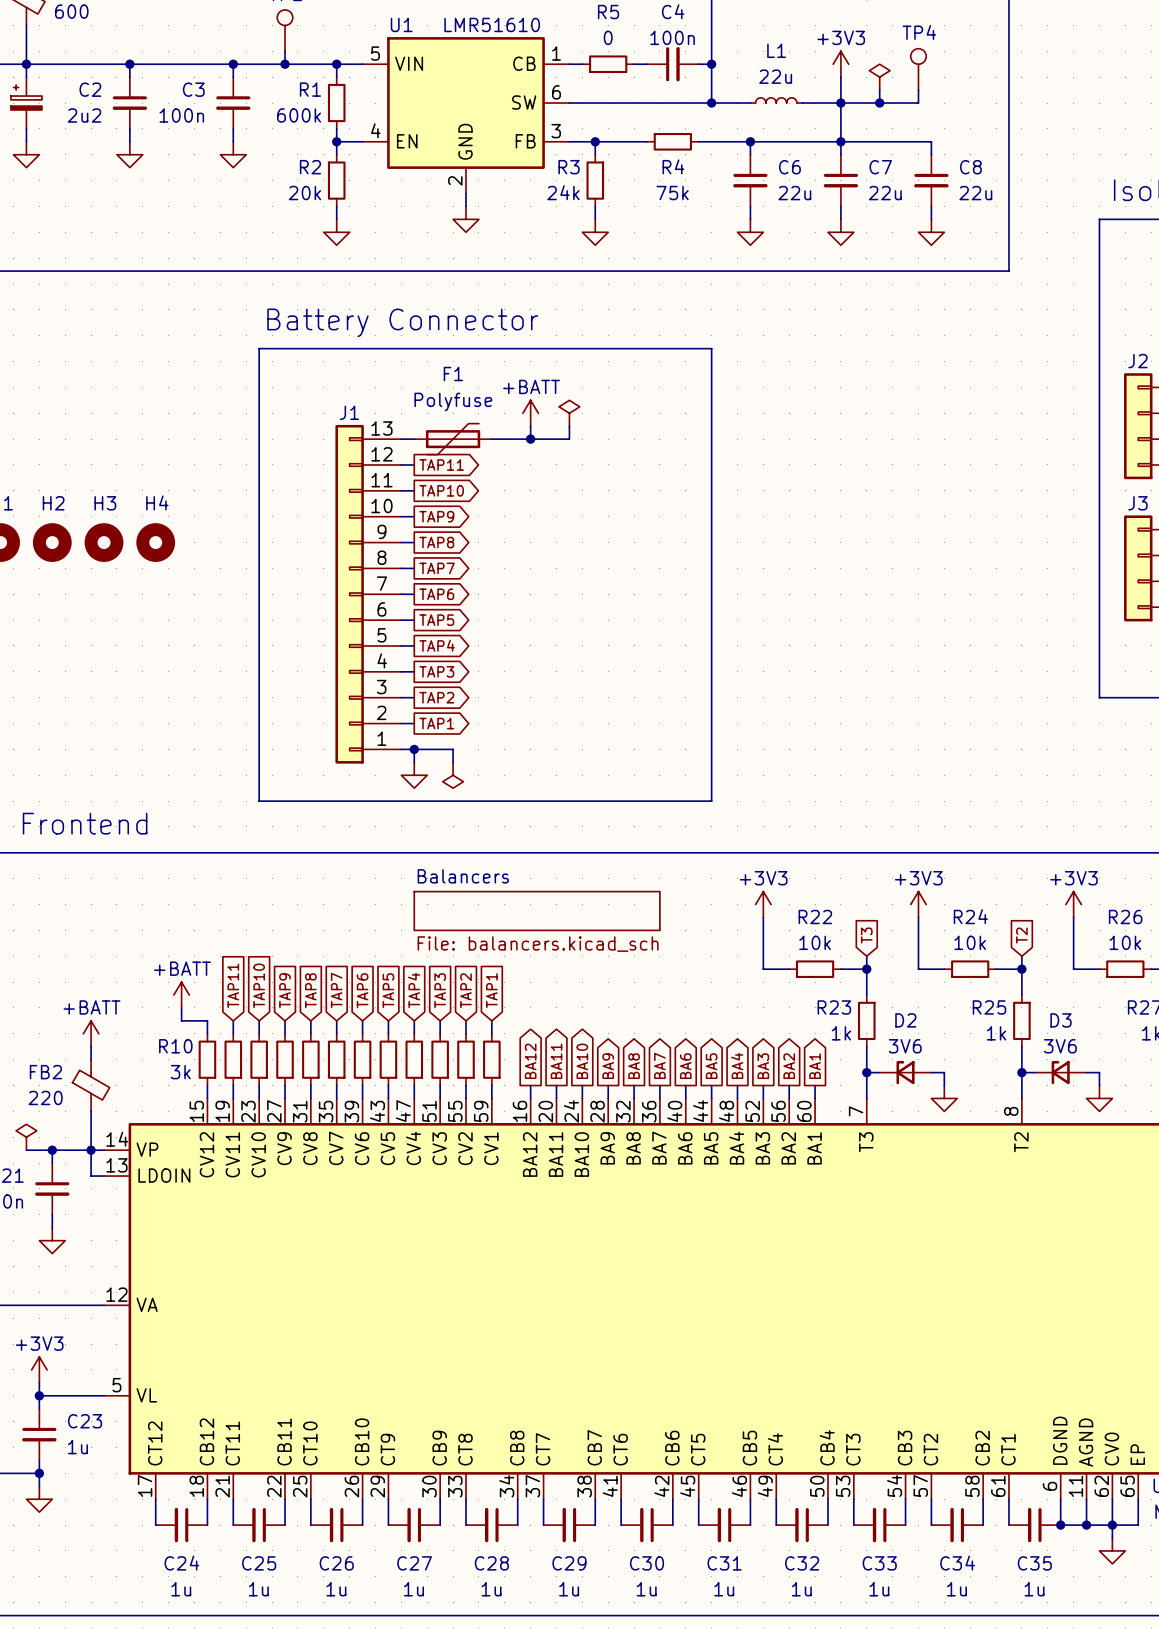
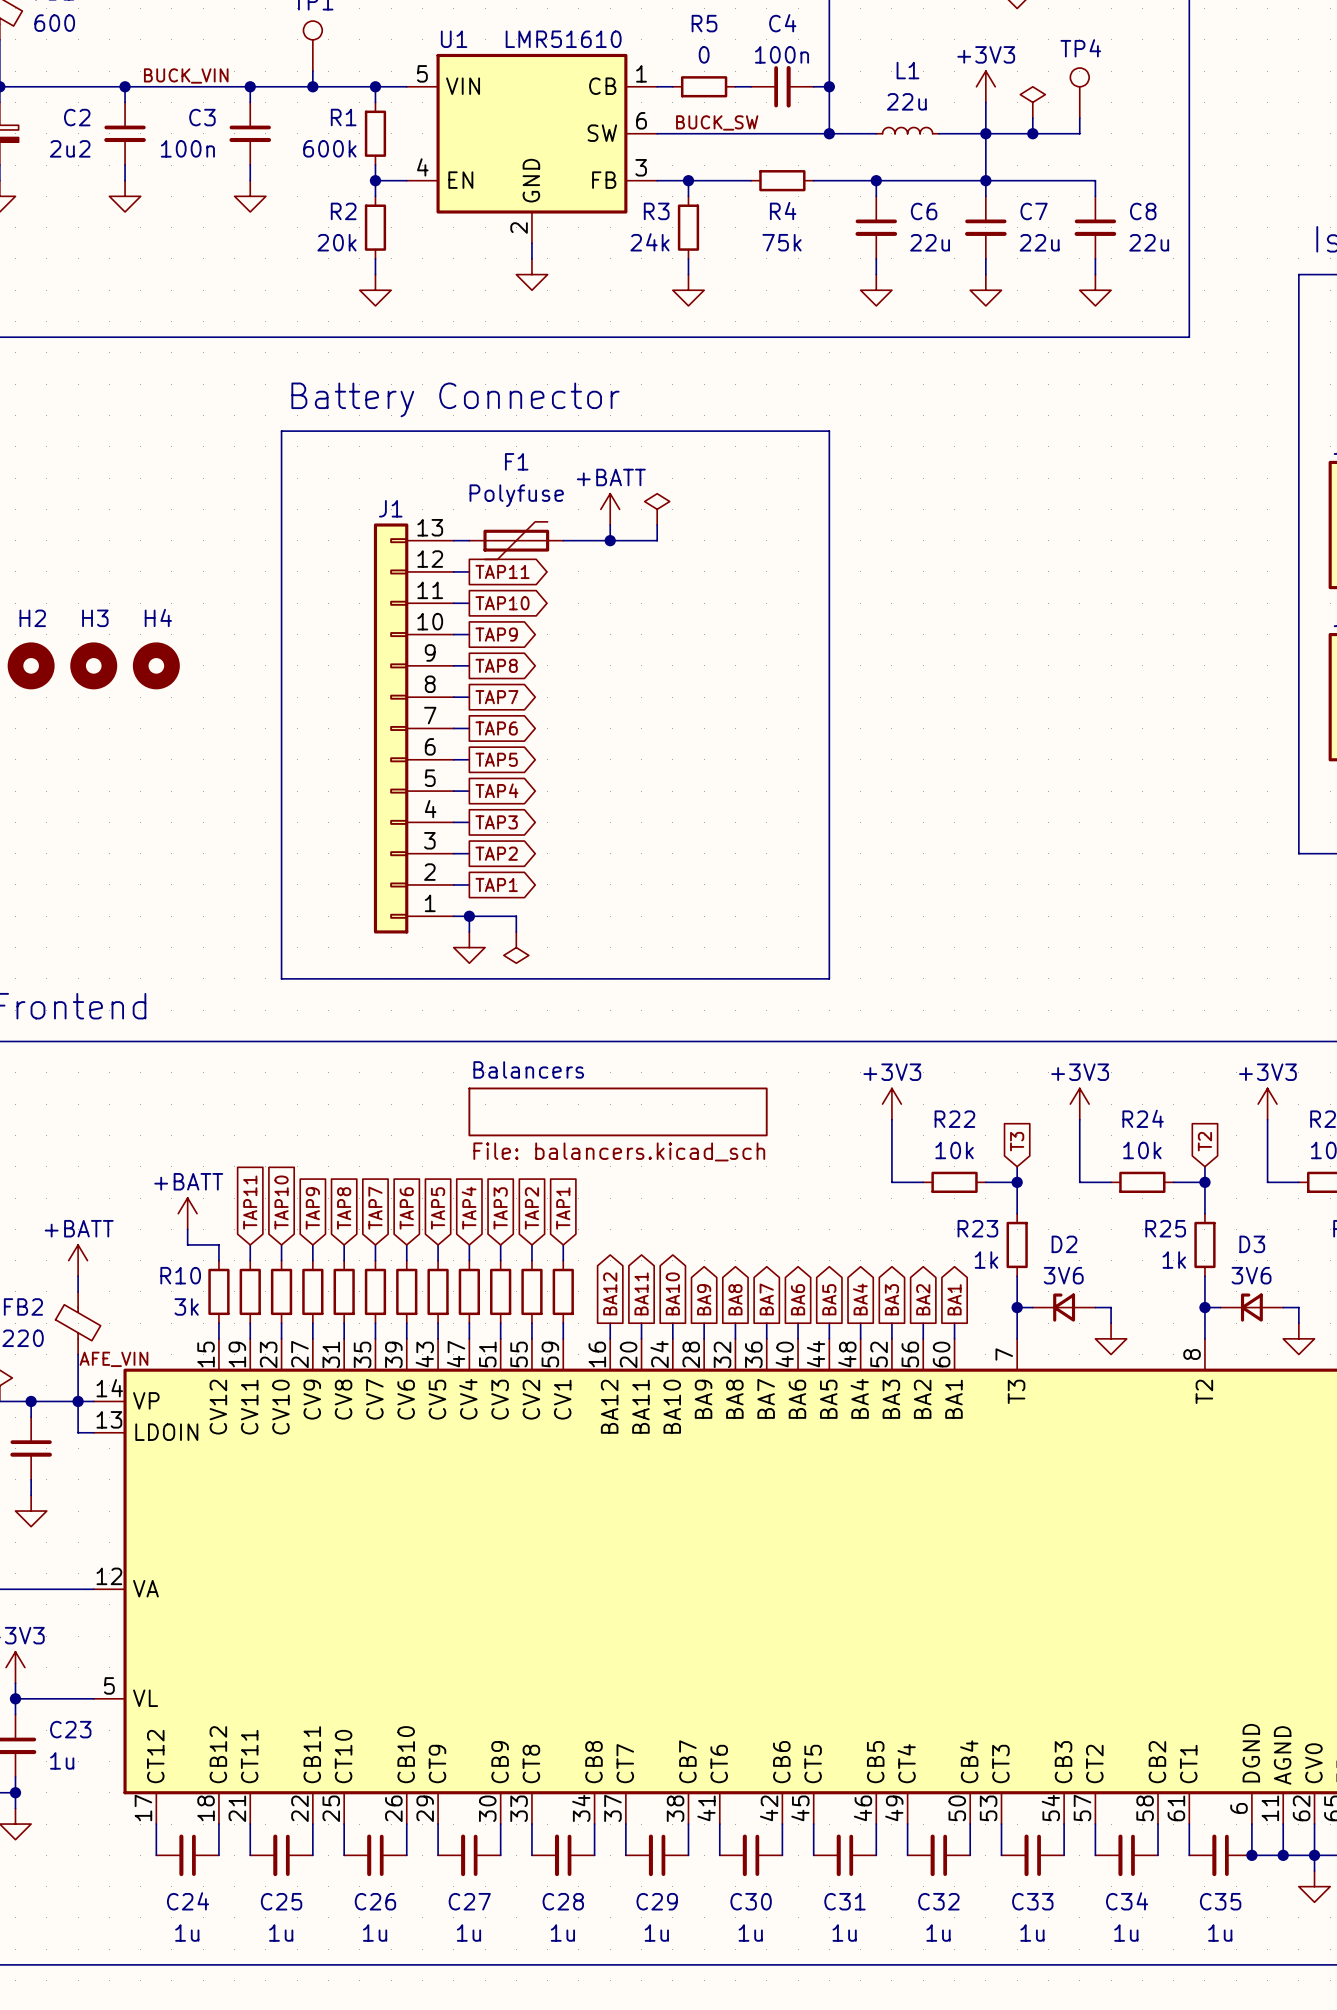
label: none -> BUCK_VIN (186, 75)
label: none -> BUCK_SW (717, 122)
label: none -> AFE_VIN (113, 1359)

